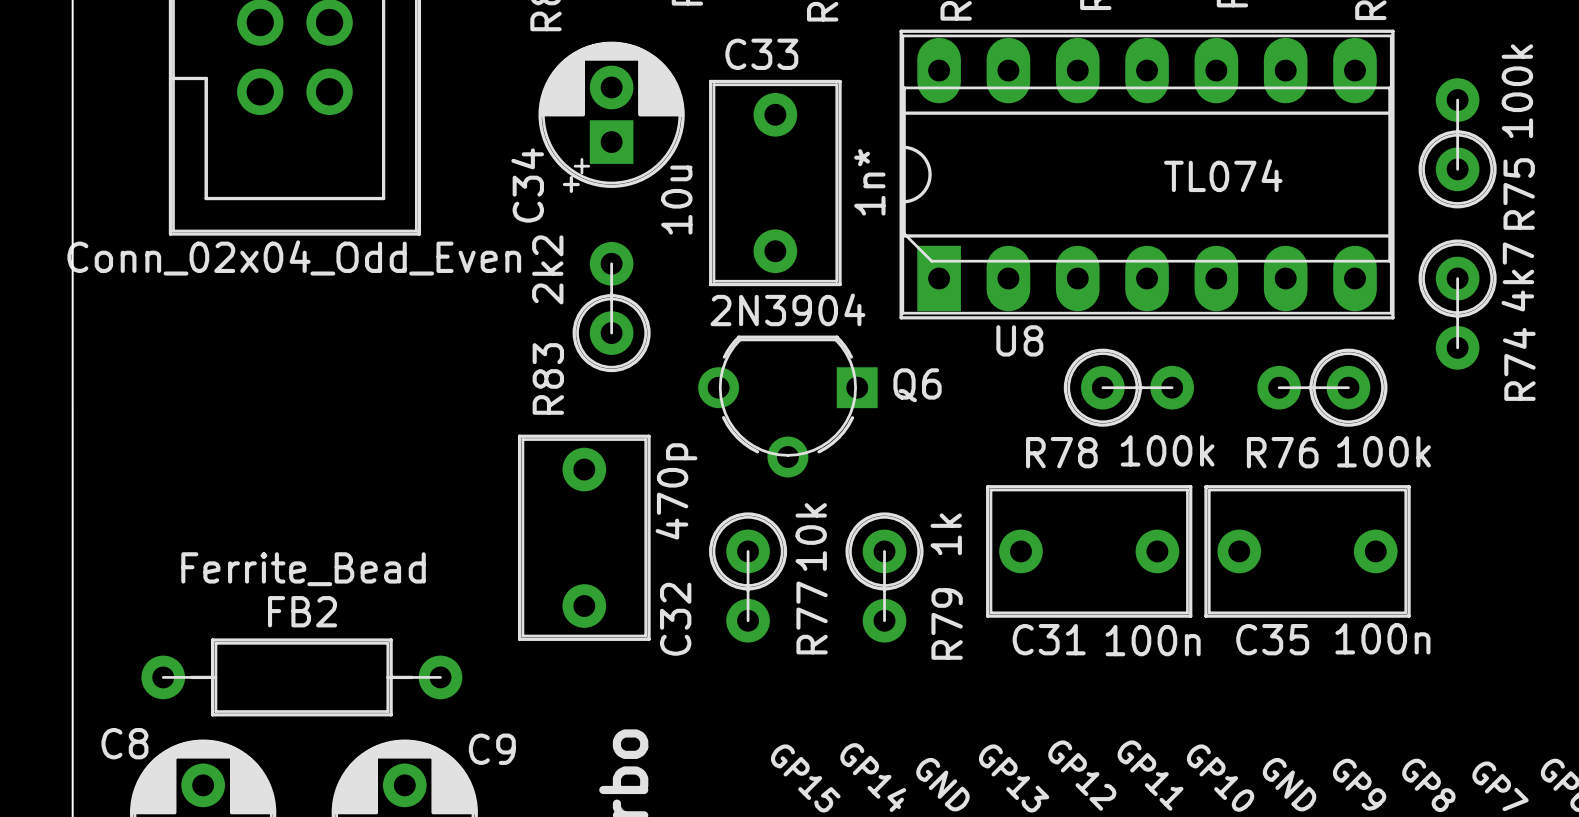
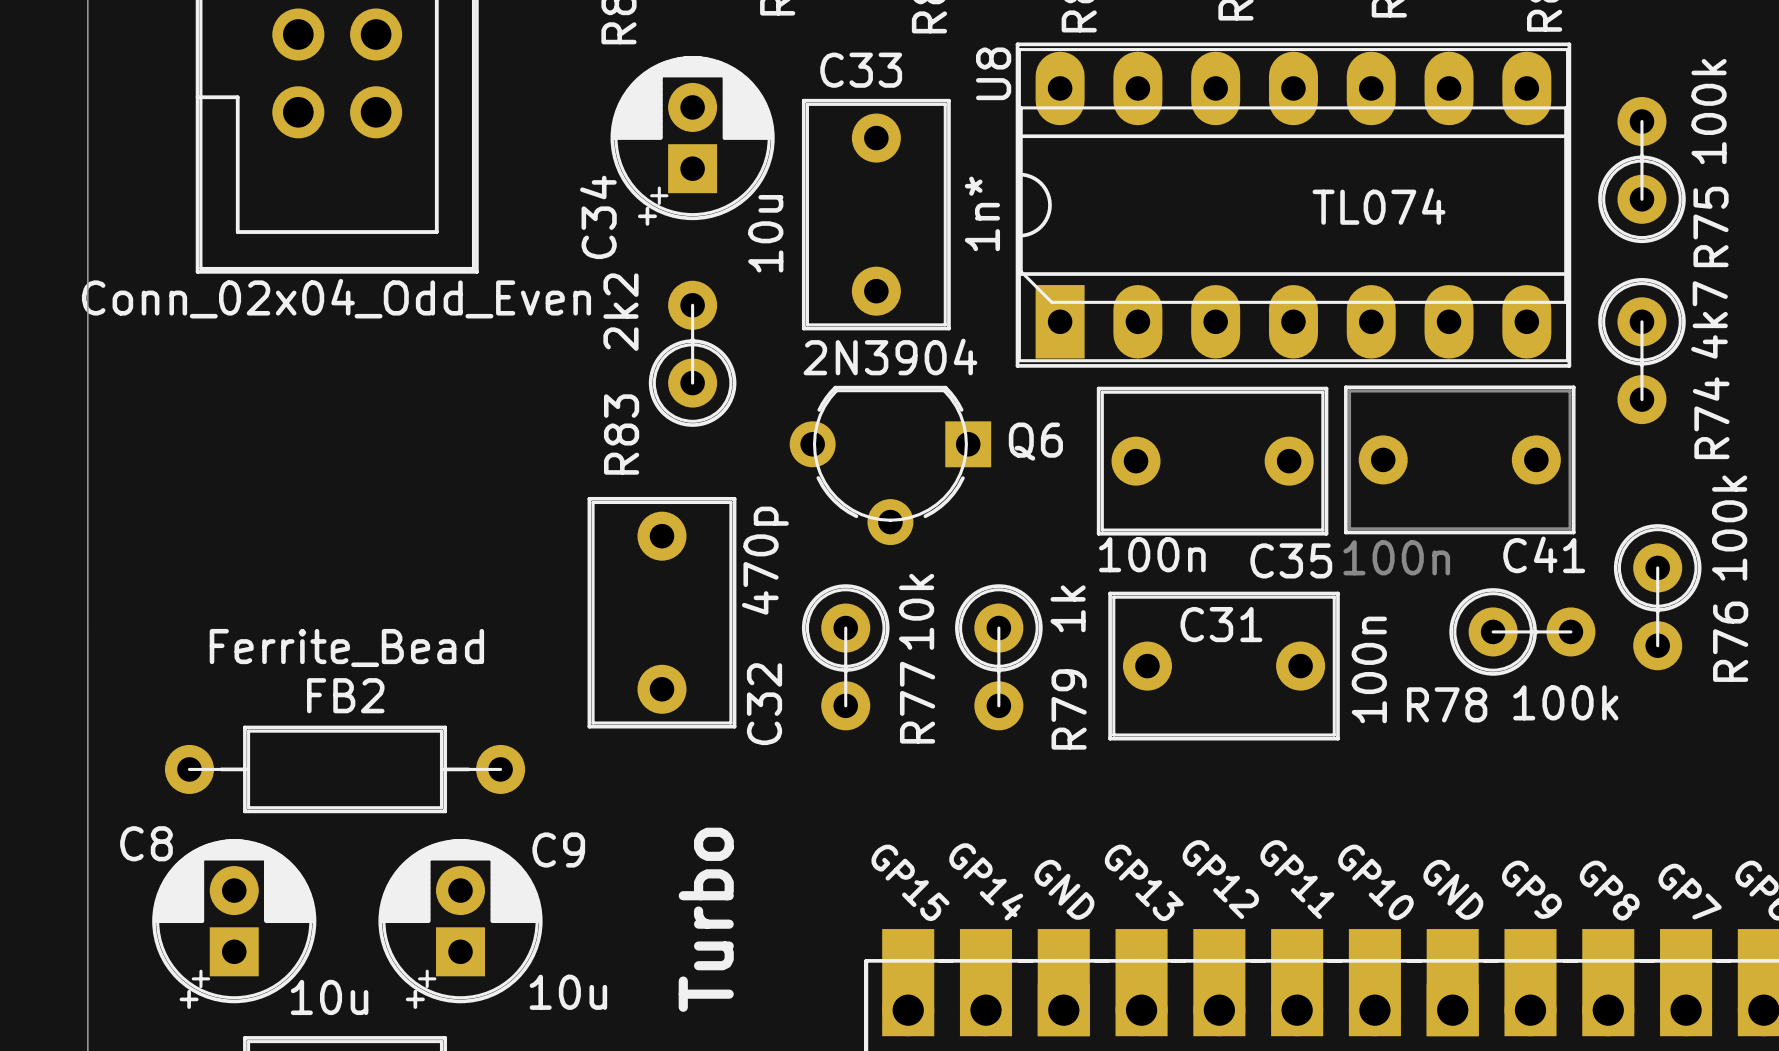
U8 name rotation: 0° (1019, 340) -> 90° counterclockwise (993, 73)
U8 name position: U8 (1019, 340) -> U8 (993, 73)
R78 position: (1128, 387) -> (1522, 631)
R76 rotation: 0° (1322, 387) -> 90° counterclockwise (1657, 597)
R76 position: (1322, 387) -> (1657, 597)
C41: none -> 100n (1459, 459)
C31 position: (1089, 551) -> (1224, 666)
C35 position: (1307, 551) -> (1212, 461)
C35 value position: 100n (1382, 638) -> 100n (1152, 554)
C31 name position: C31 (1049, 639) -> C31 (1221, 624)
C35 name position: C35 (1272, 639) -> C35 (1291, 560)
C31 value rotation: 0° (1153, 640) -> 90° counterclockwise (1369, 669)

